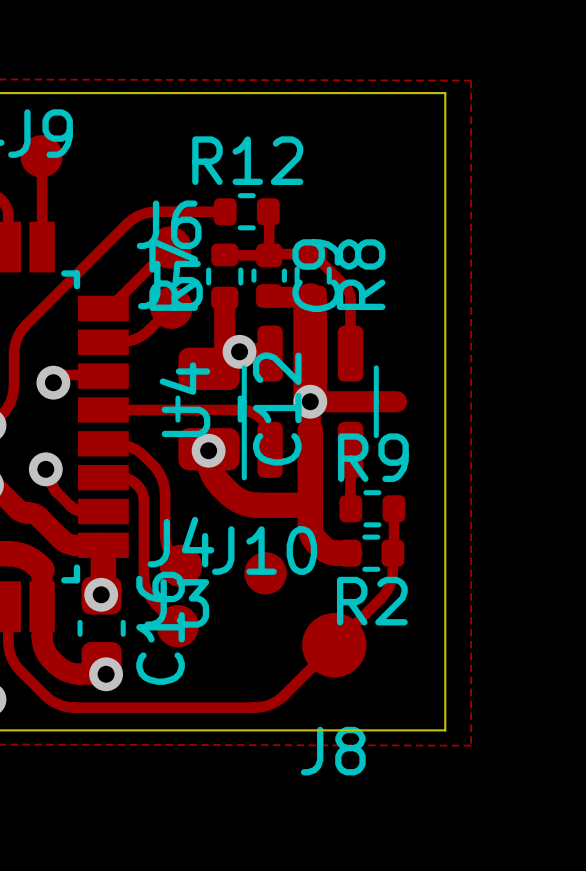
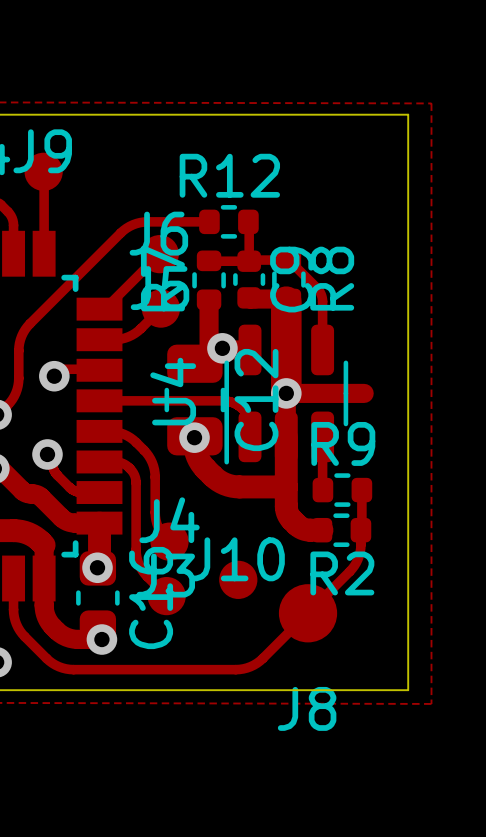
J10 position: (265, 573) -> (238, 579)

